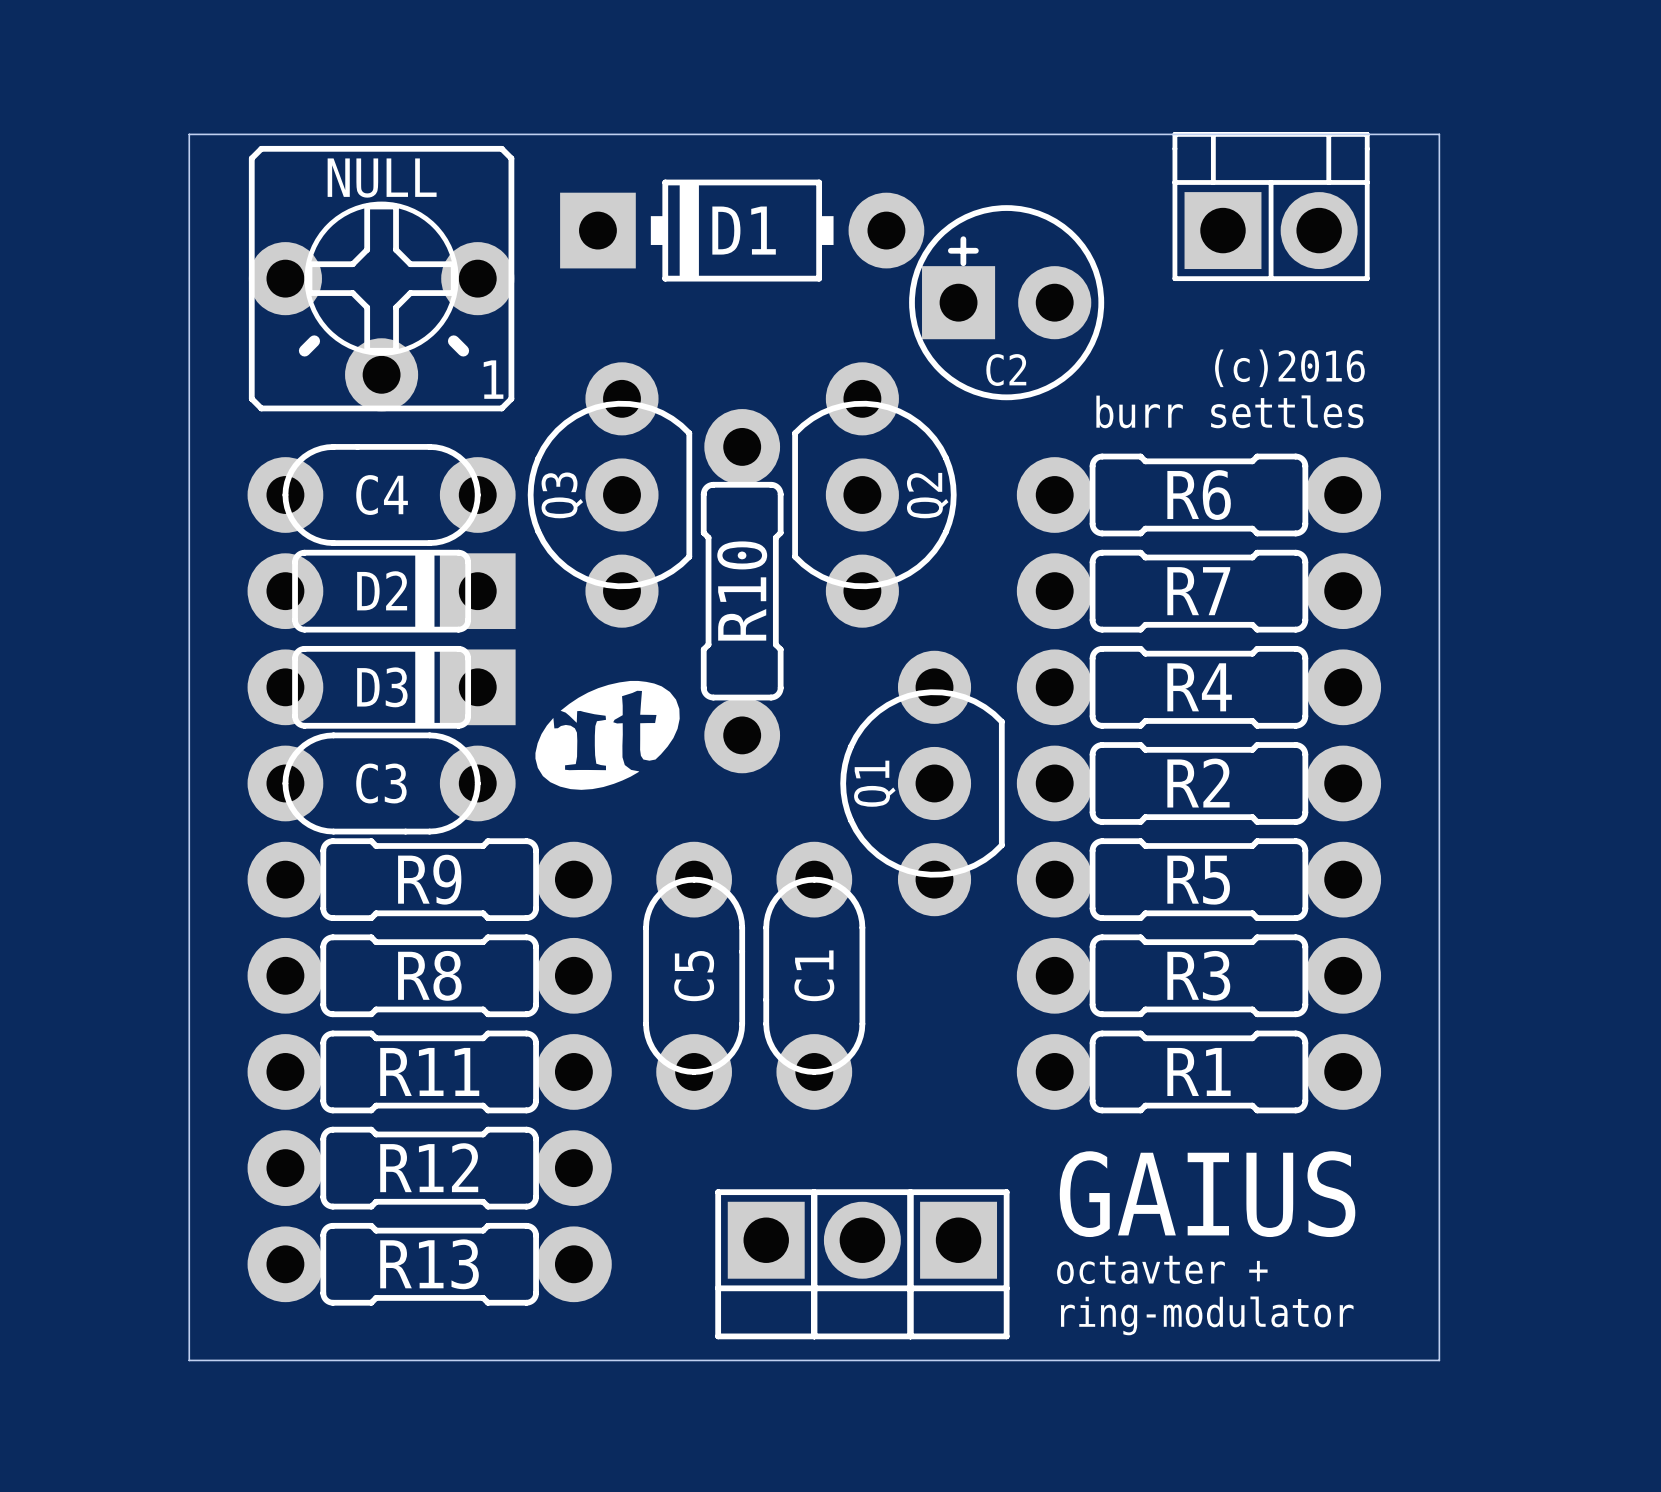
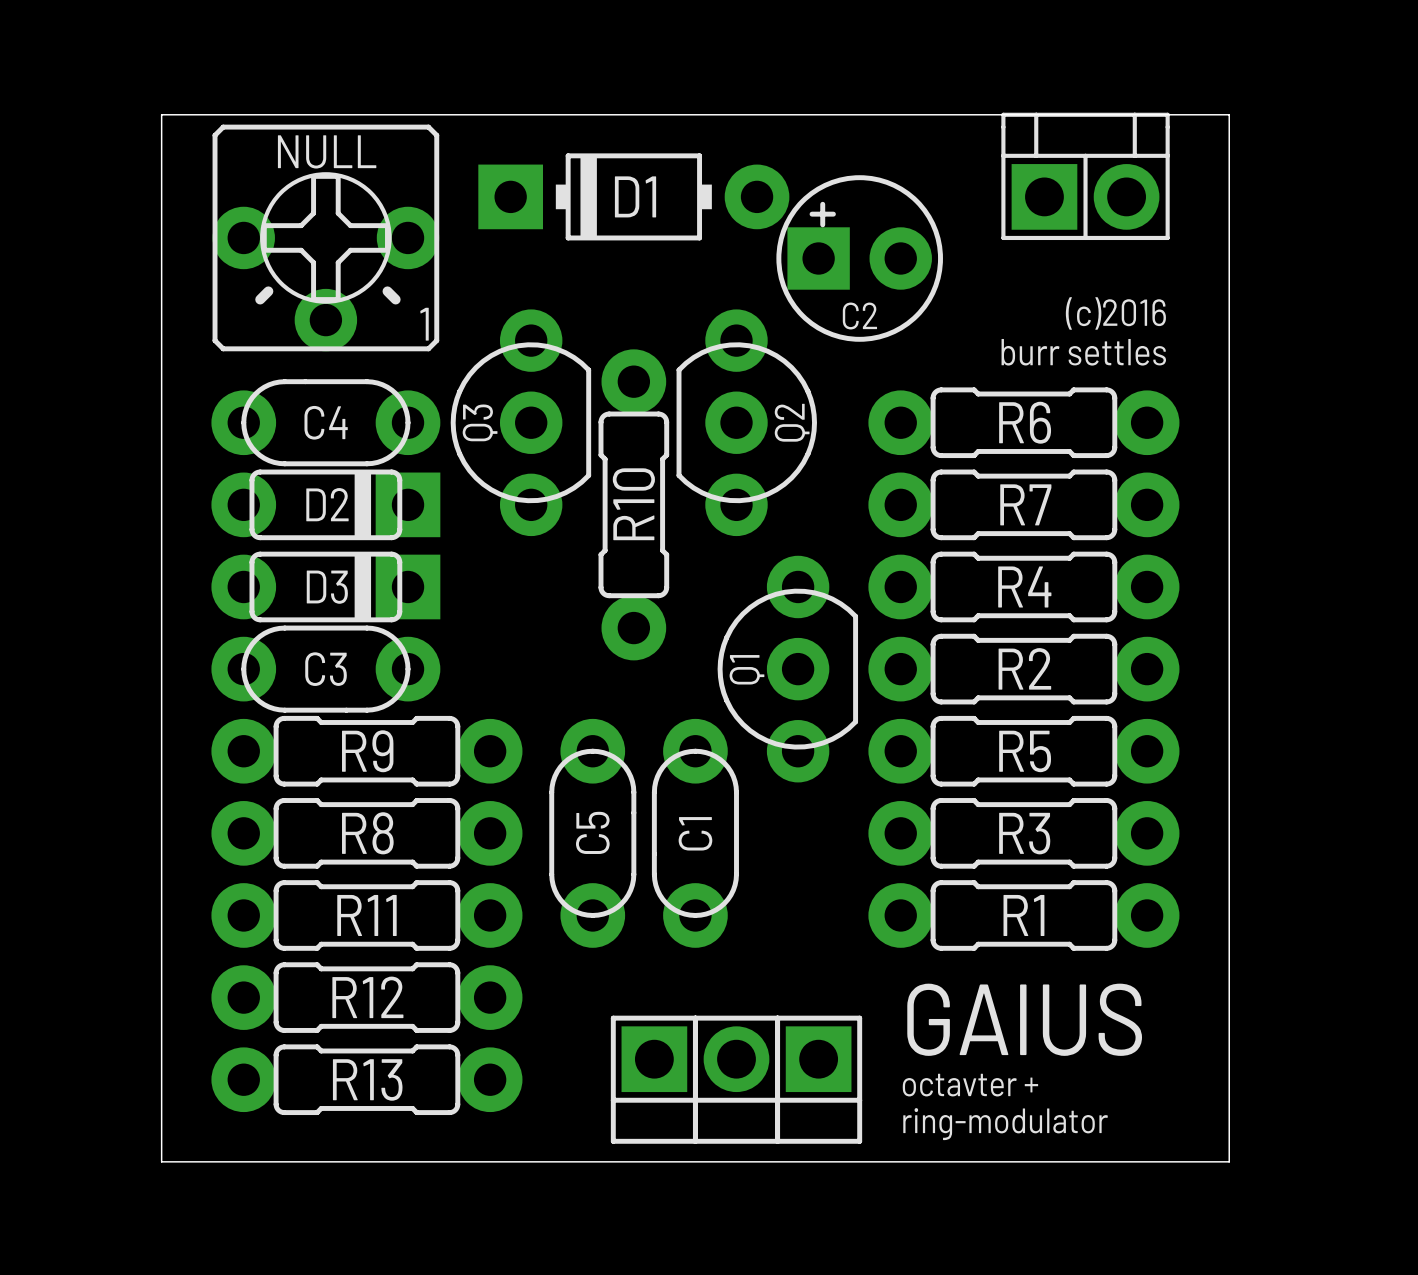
drawing: [535, 680, 680, 790] -> none

